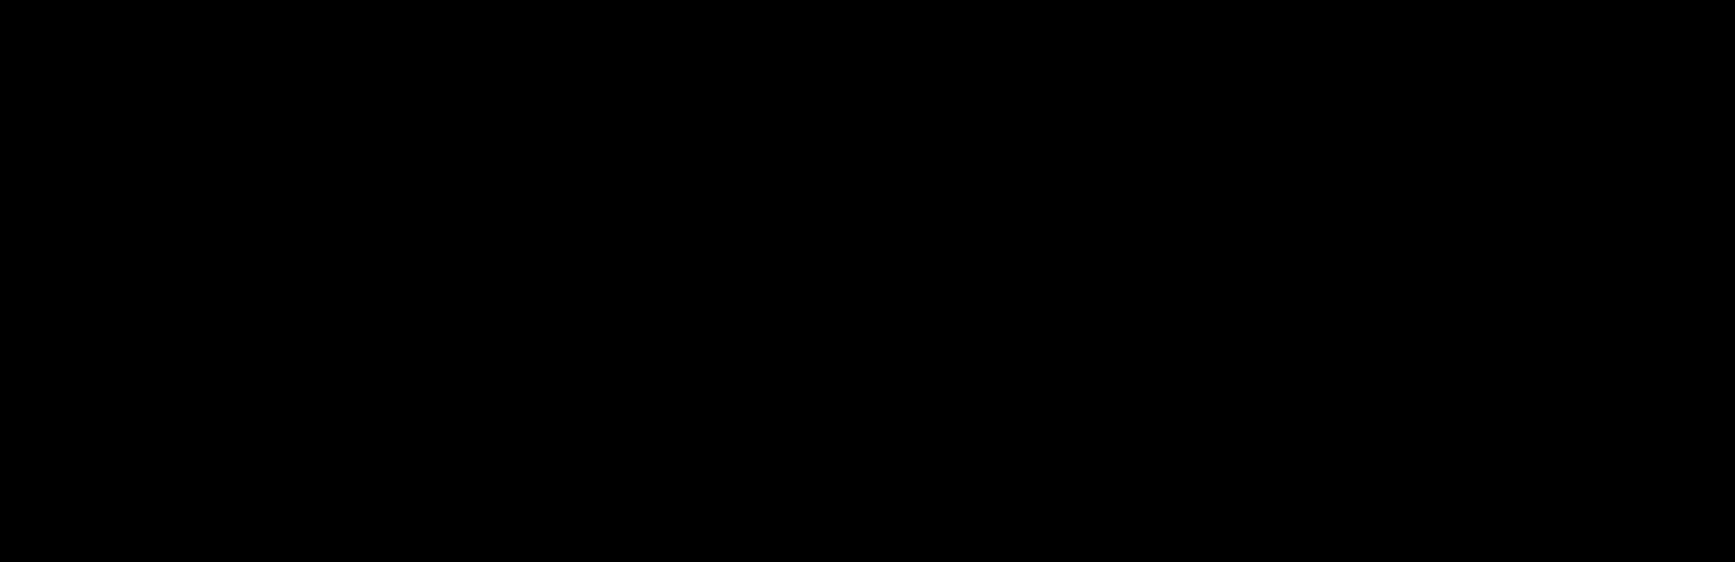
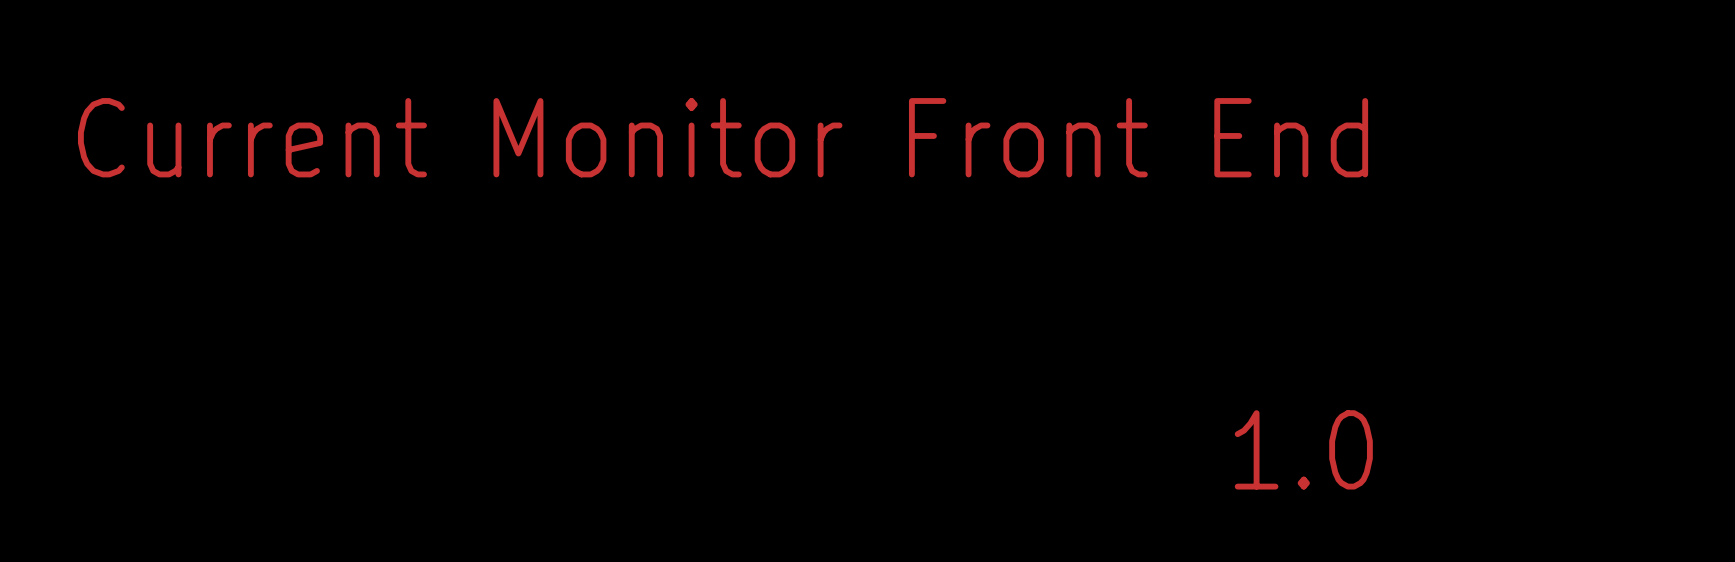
text: none -> Current Monitor Front End (723, 137)
text: none -> 1.0 (1303, 449)

